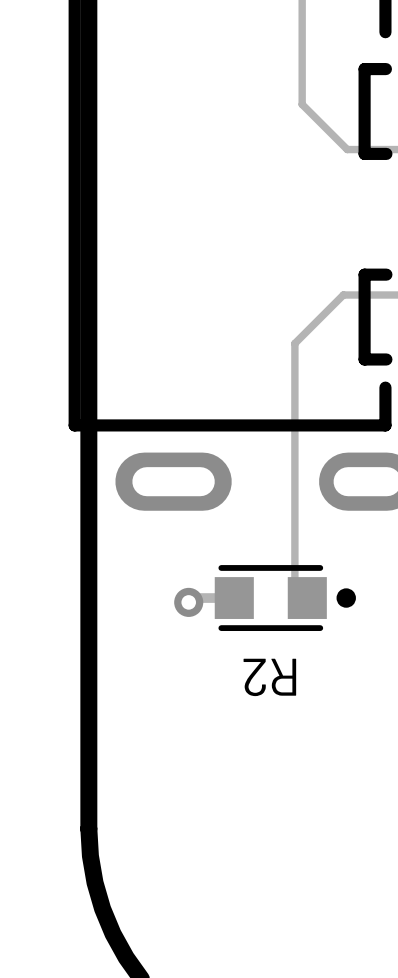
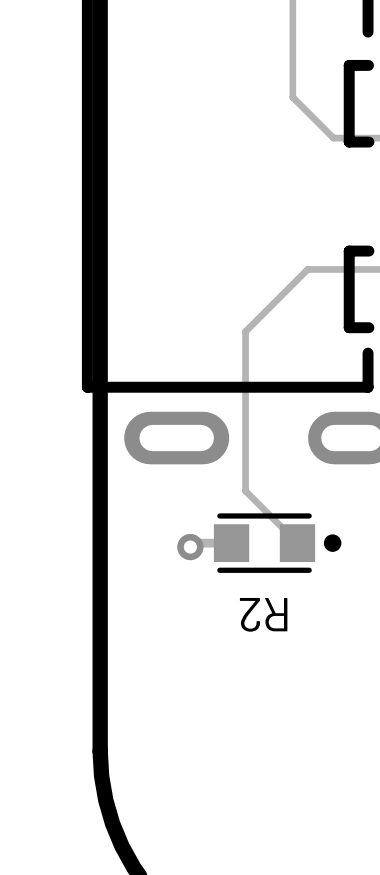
track: (343, 295) (294, 343) (294, 585) -> (330, 269) (307, 269) (245, 331) (245, 491) (286, 531)

